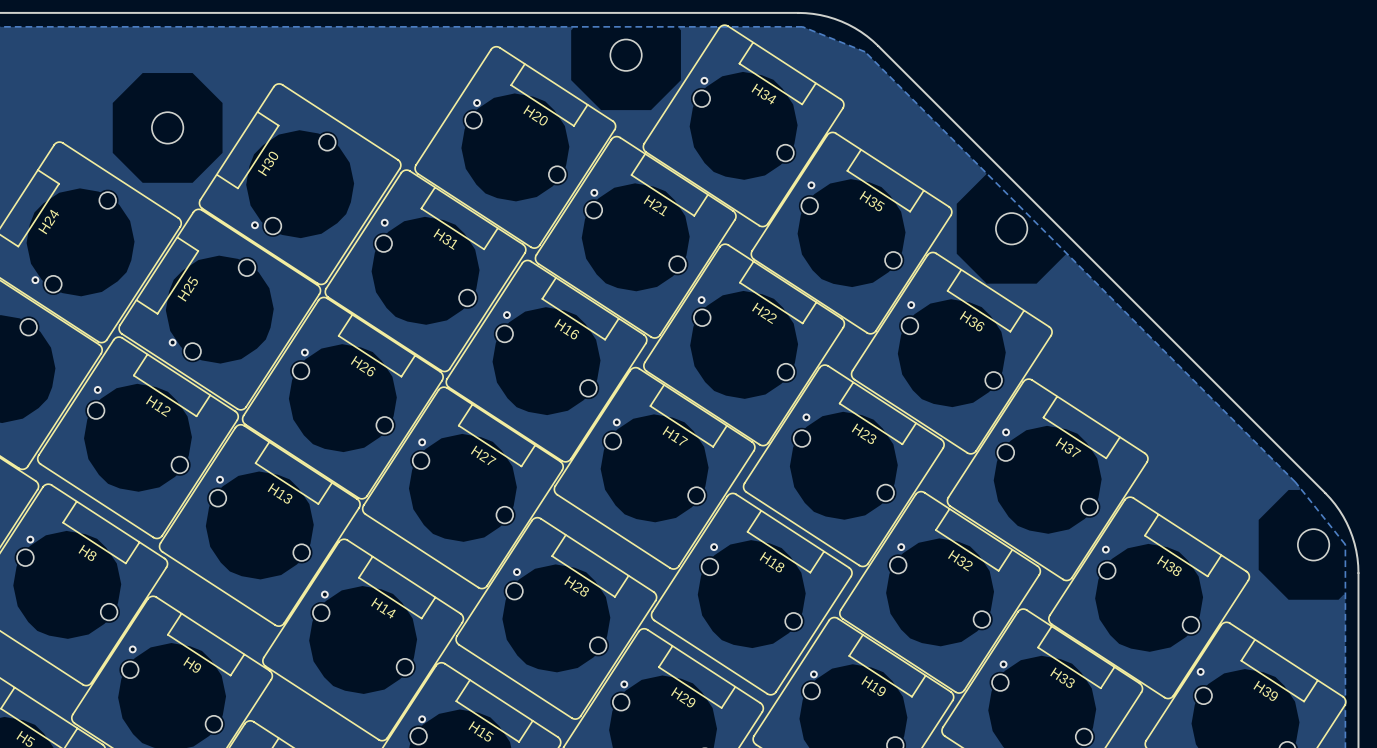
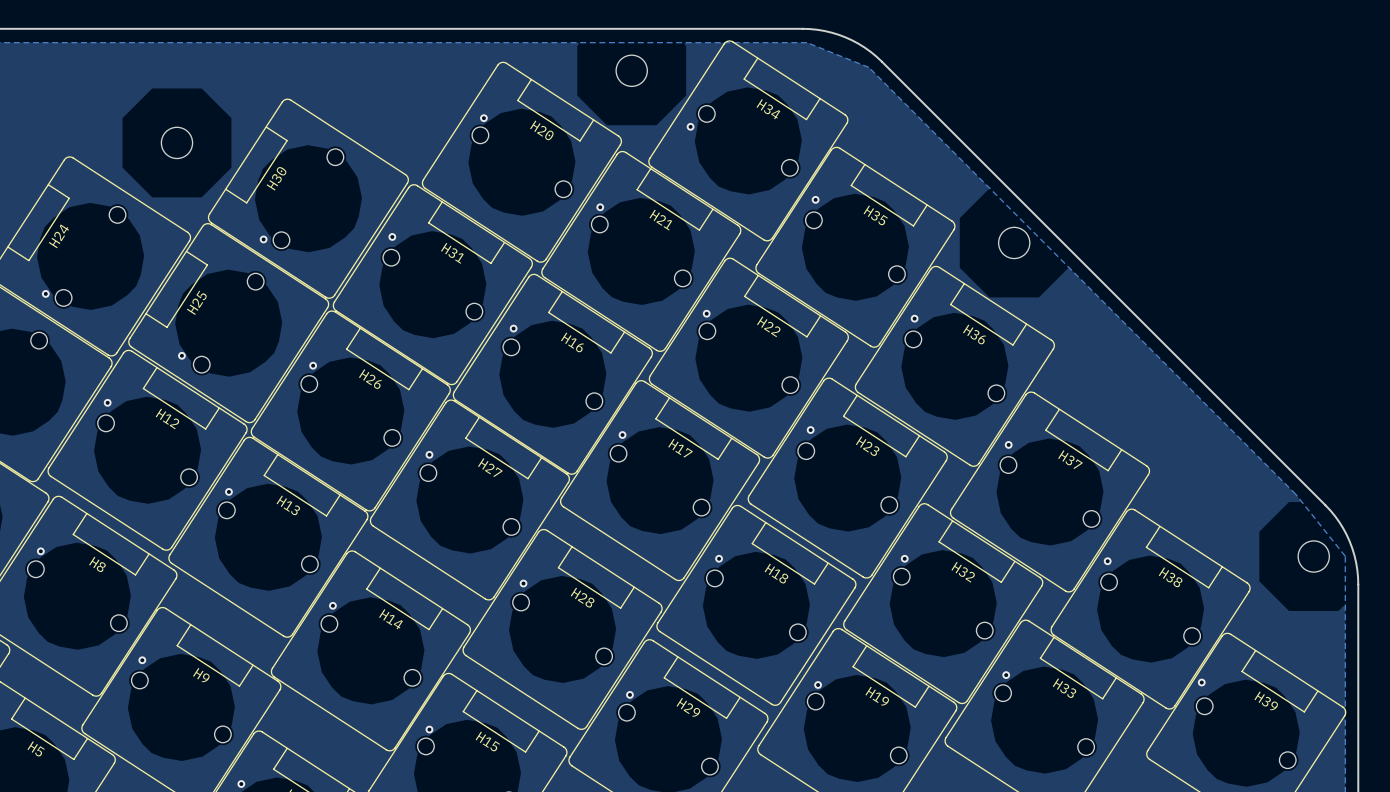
via position: (704, 80) -> (690, 126)

